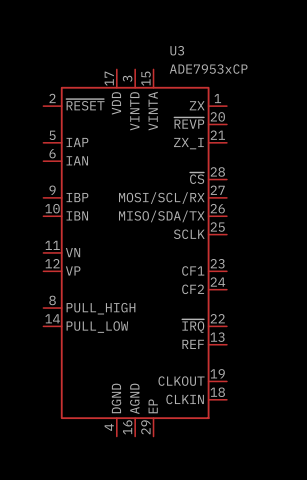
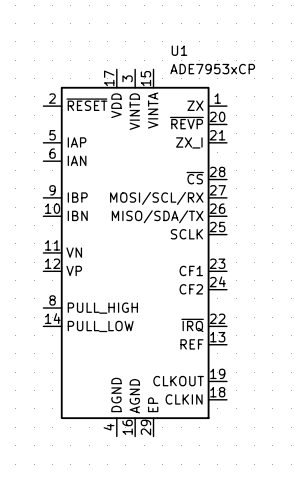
U3 name: U3 (177, 50) -> U1 (179, 50)

